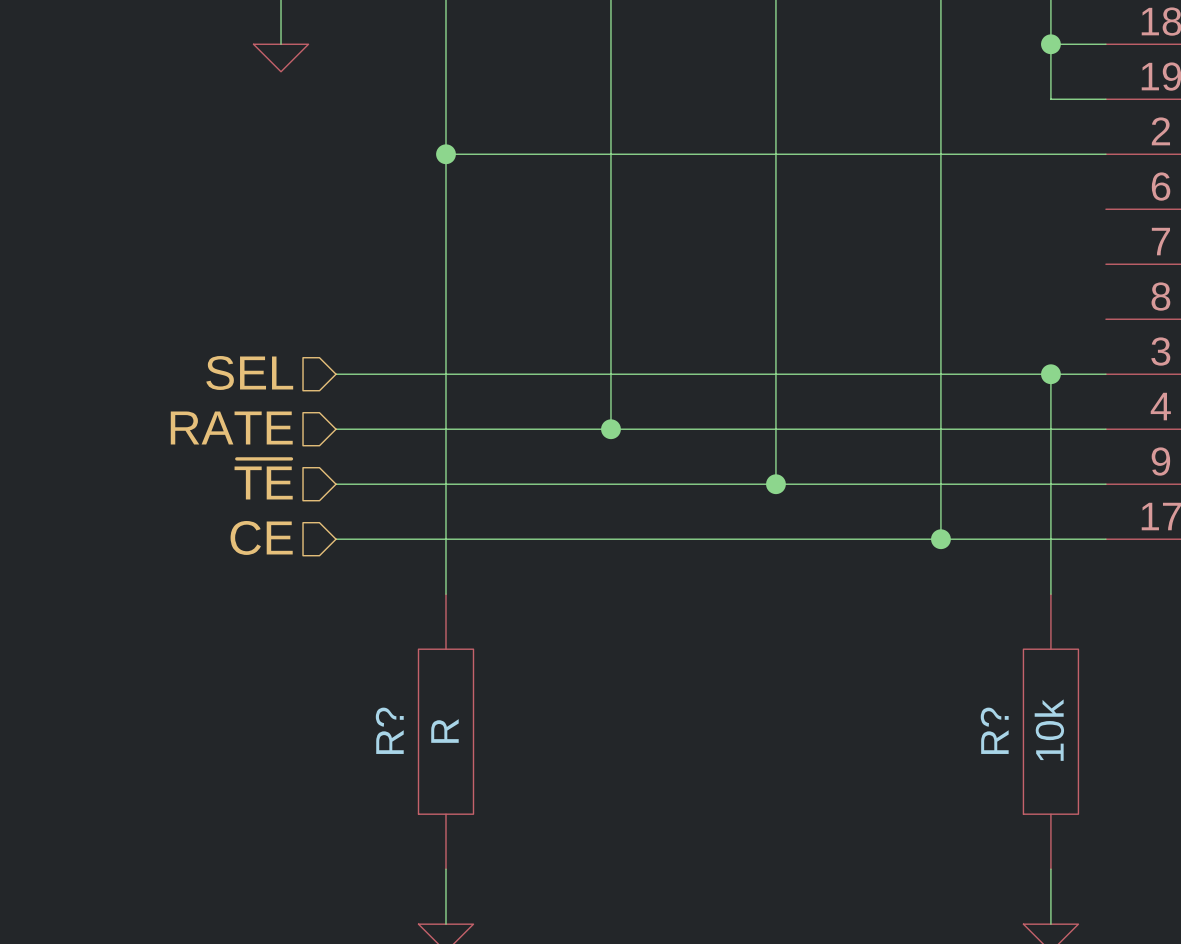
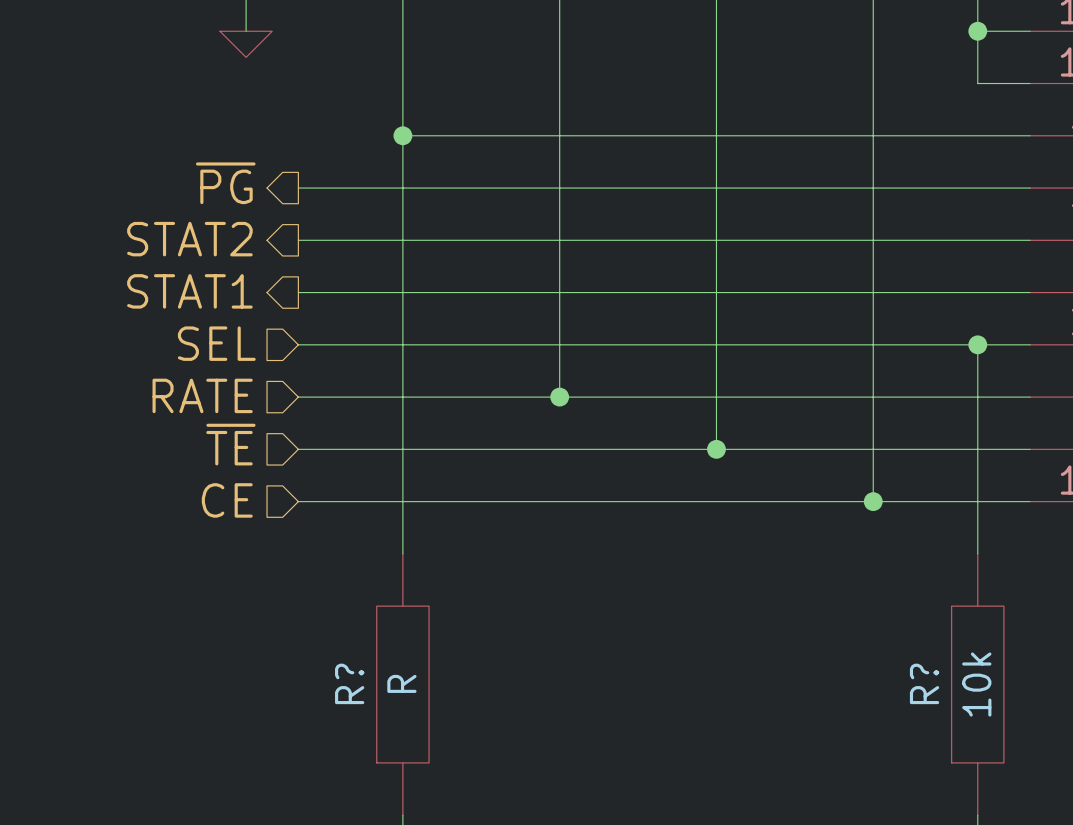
hierarchical label: none -> ~{PG} (225, 183)
wire: none -> (298, 188) (1030, 188)
hierarchical label: none -> STAT2 (189, 239)
wire: none -> (298, 240) (1030, 240)
hierarchical label: none -> STAT1 (189, 291)
wire: none -> (298, 292) (1030, 292)

